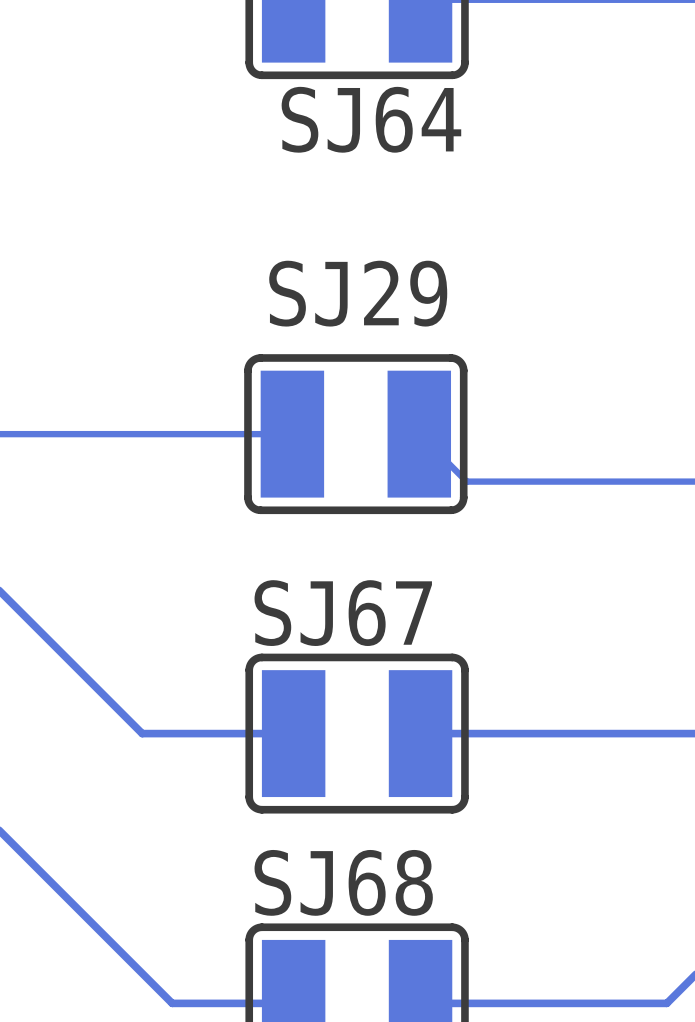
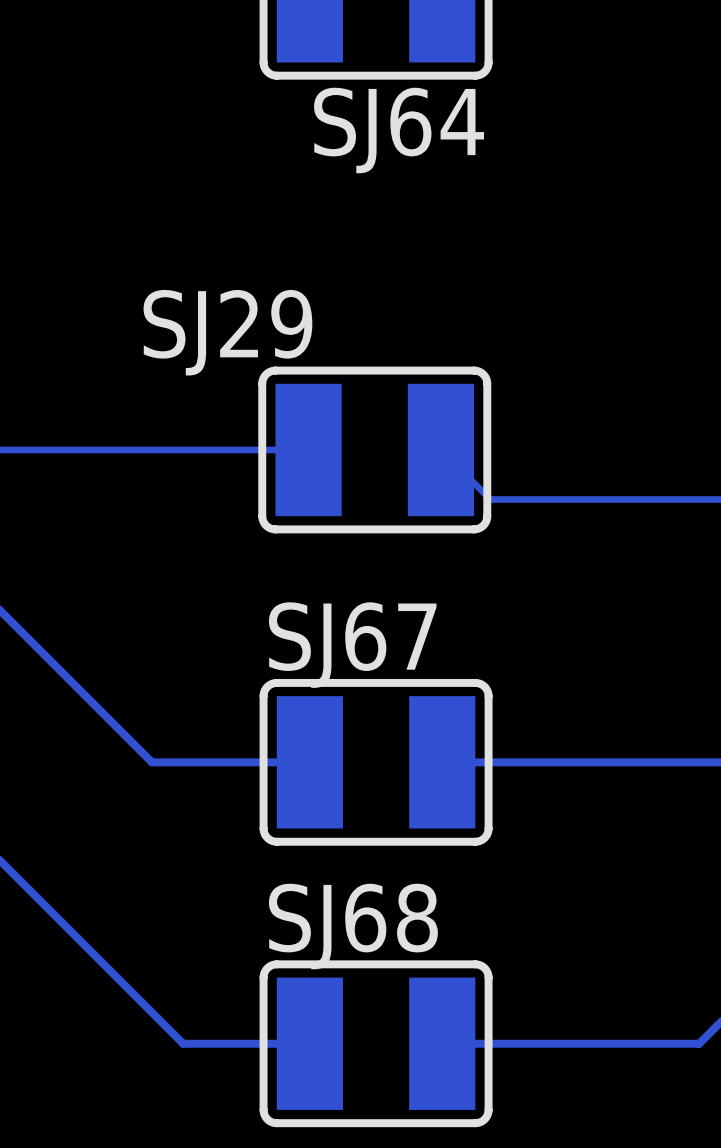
SJ29 name position: SJ29 (358, 293) -> SJ29 (227, 332)

